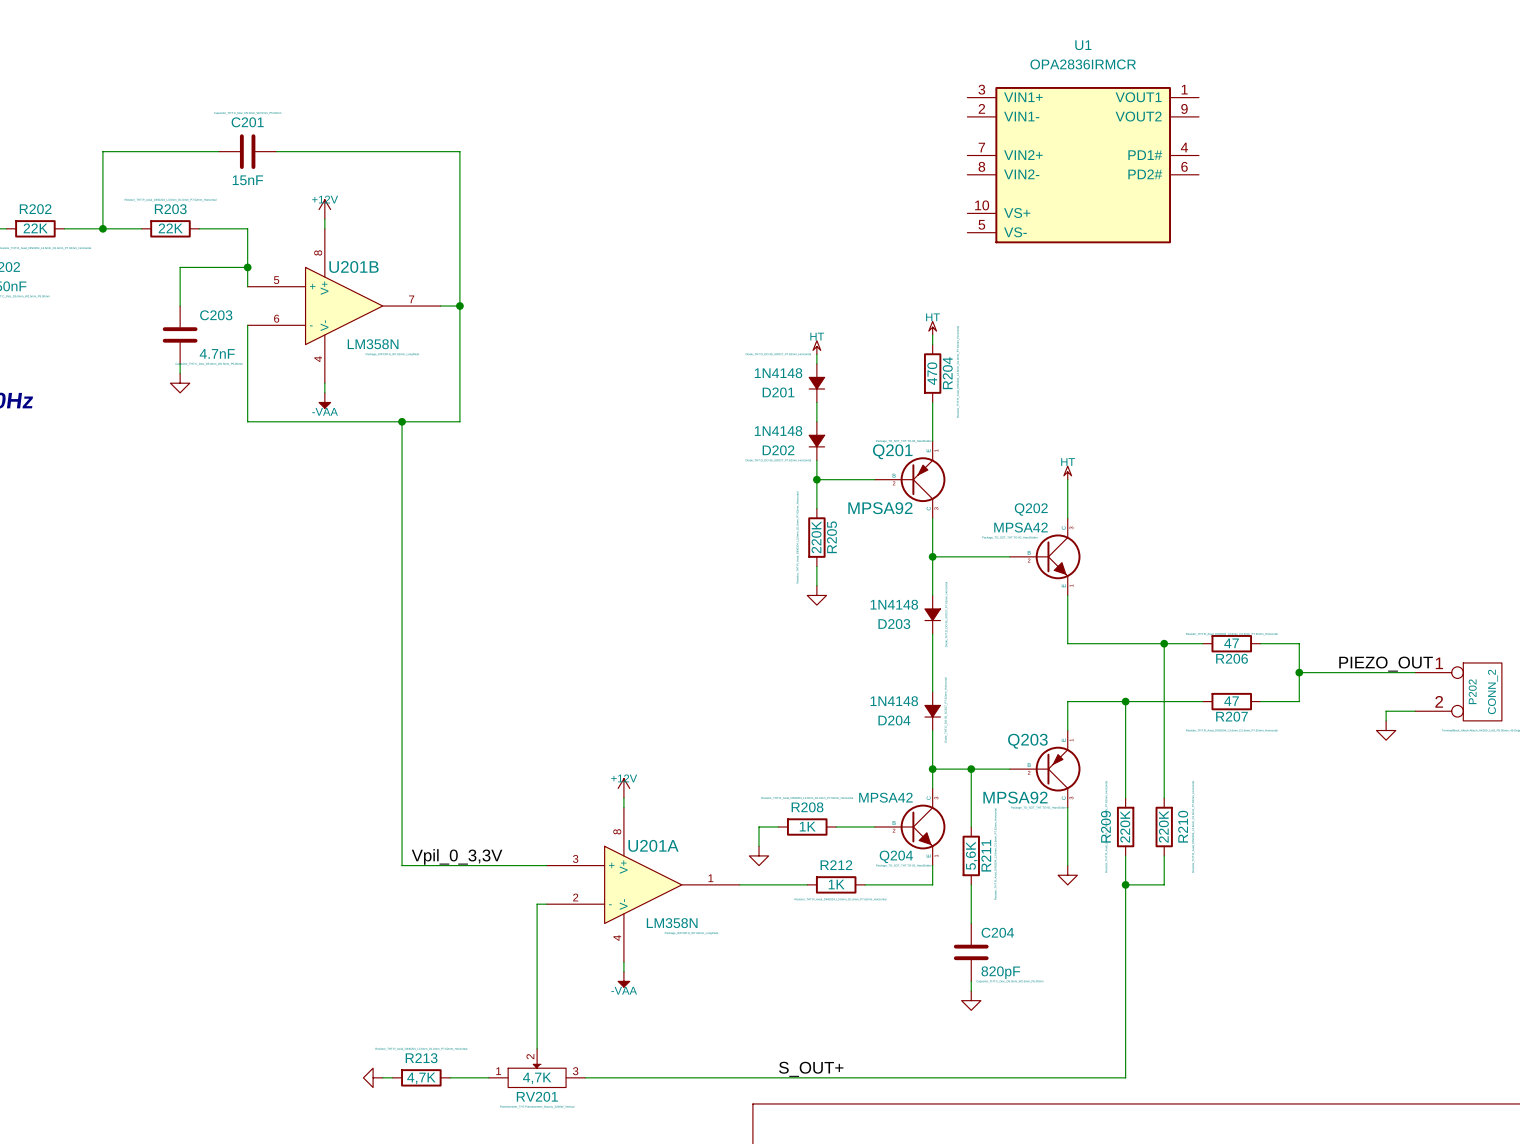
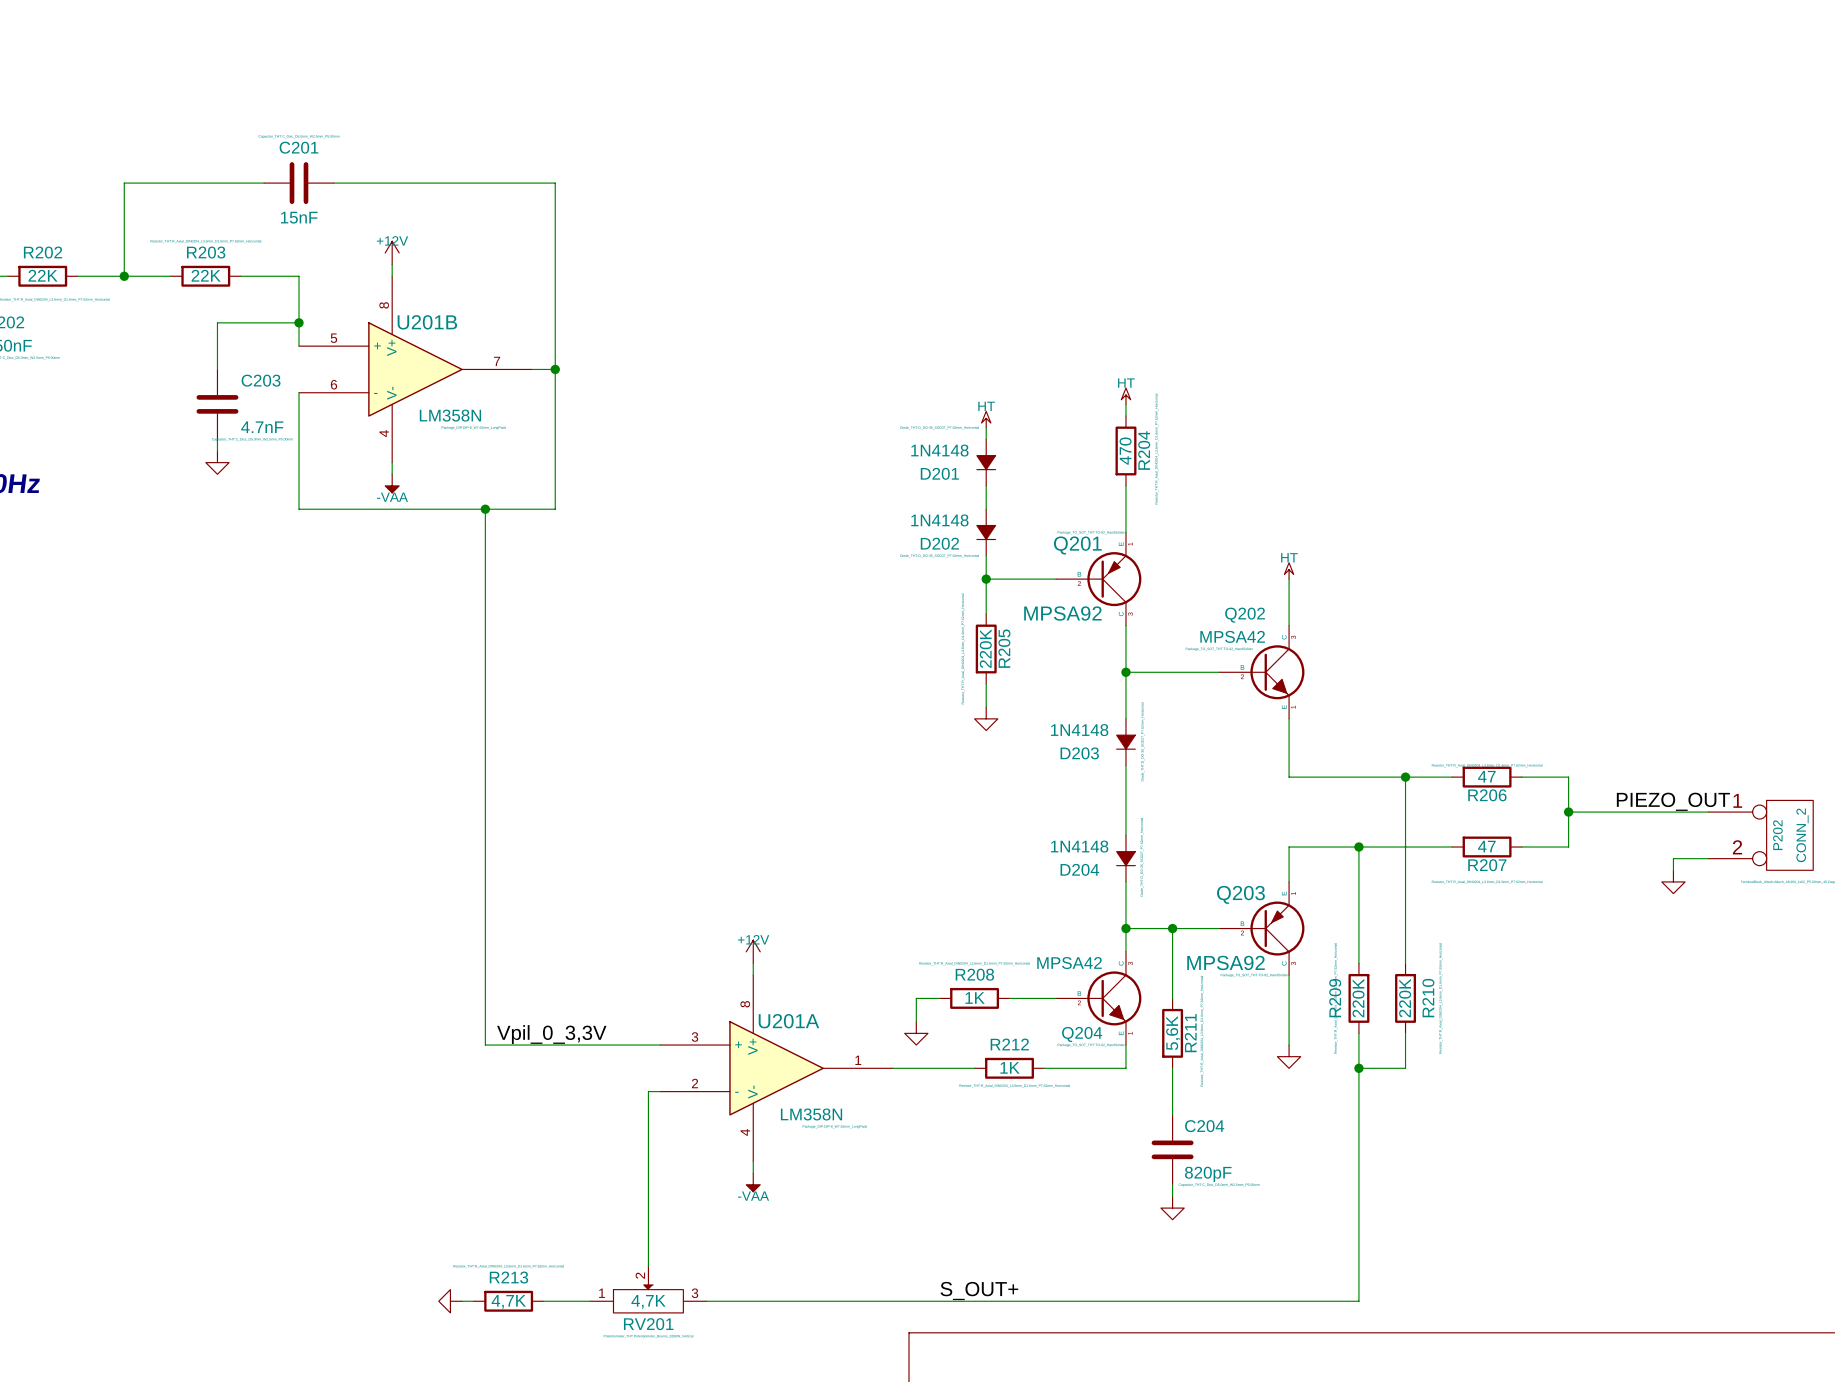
U1: OPA2836IRMCR (1083, 165) -> none

